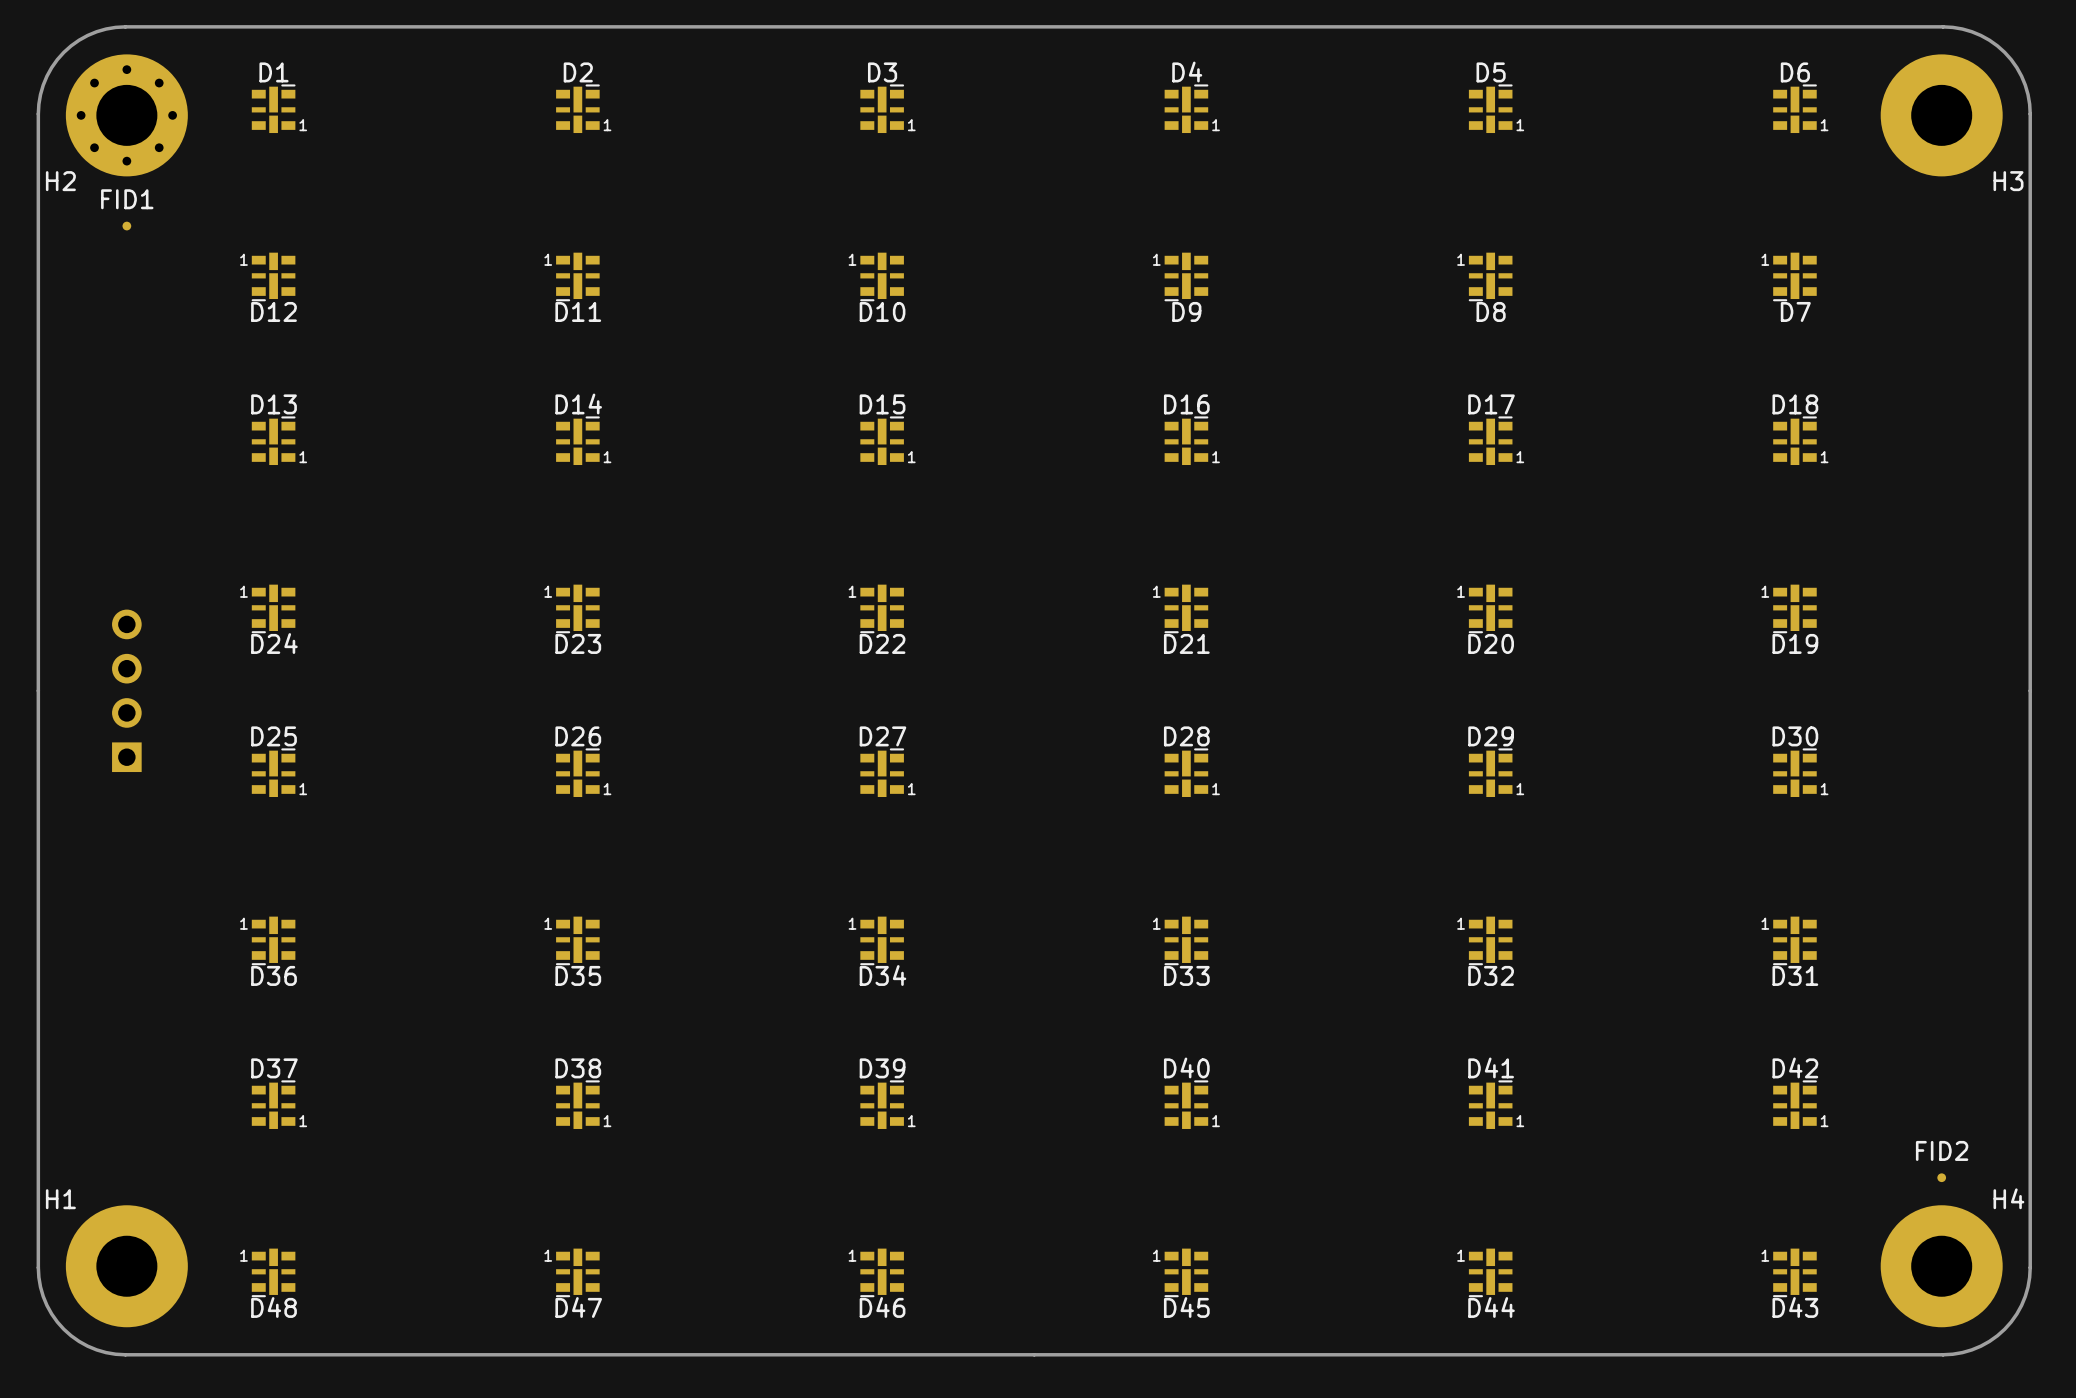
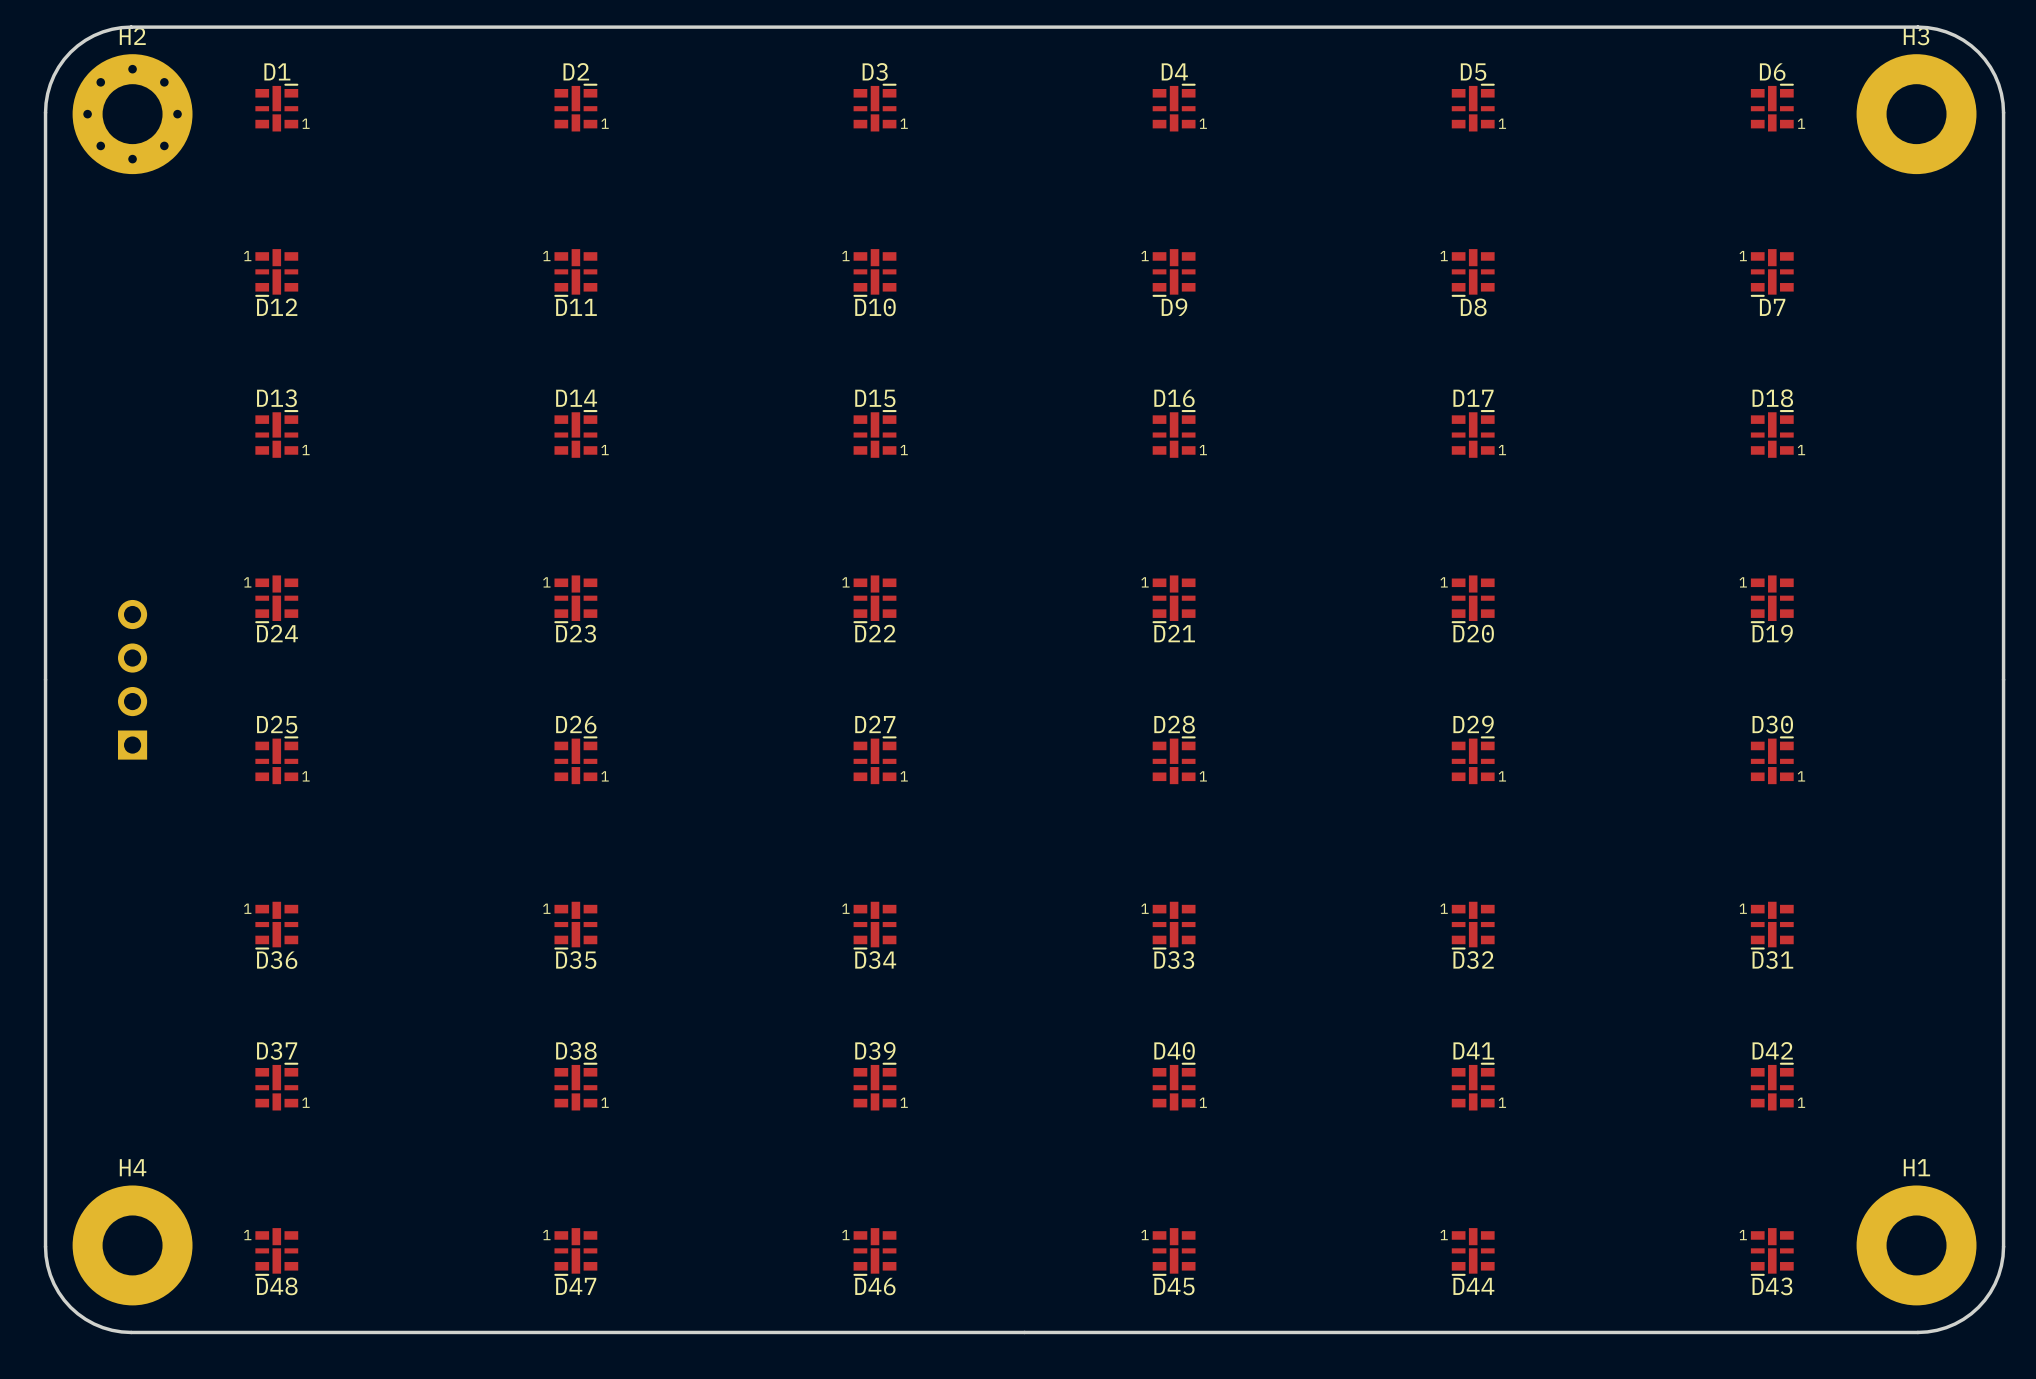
H2 name position: H2 (60, 181) -> H2 (132, 36)
H3 name position: H3 (2008, 181) -> H3 (1916, 36)
FID1: (126, 226) -> none
FID2: (1941, 1177) -> none
H4 name: H4 (2008, 1198) -> H1 (1916, 1167)
H1 name: H1 (60, 1199) -> H4 (133, 1167)

